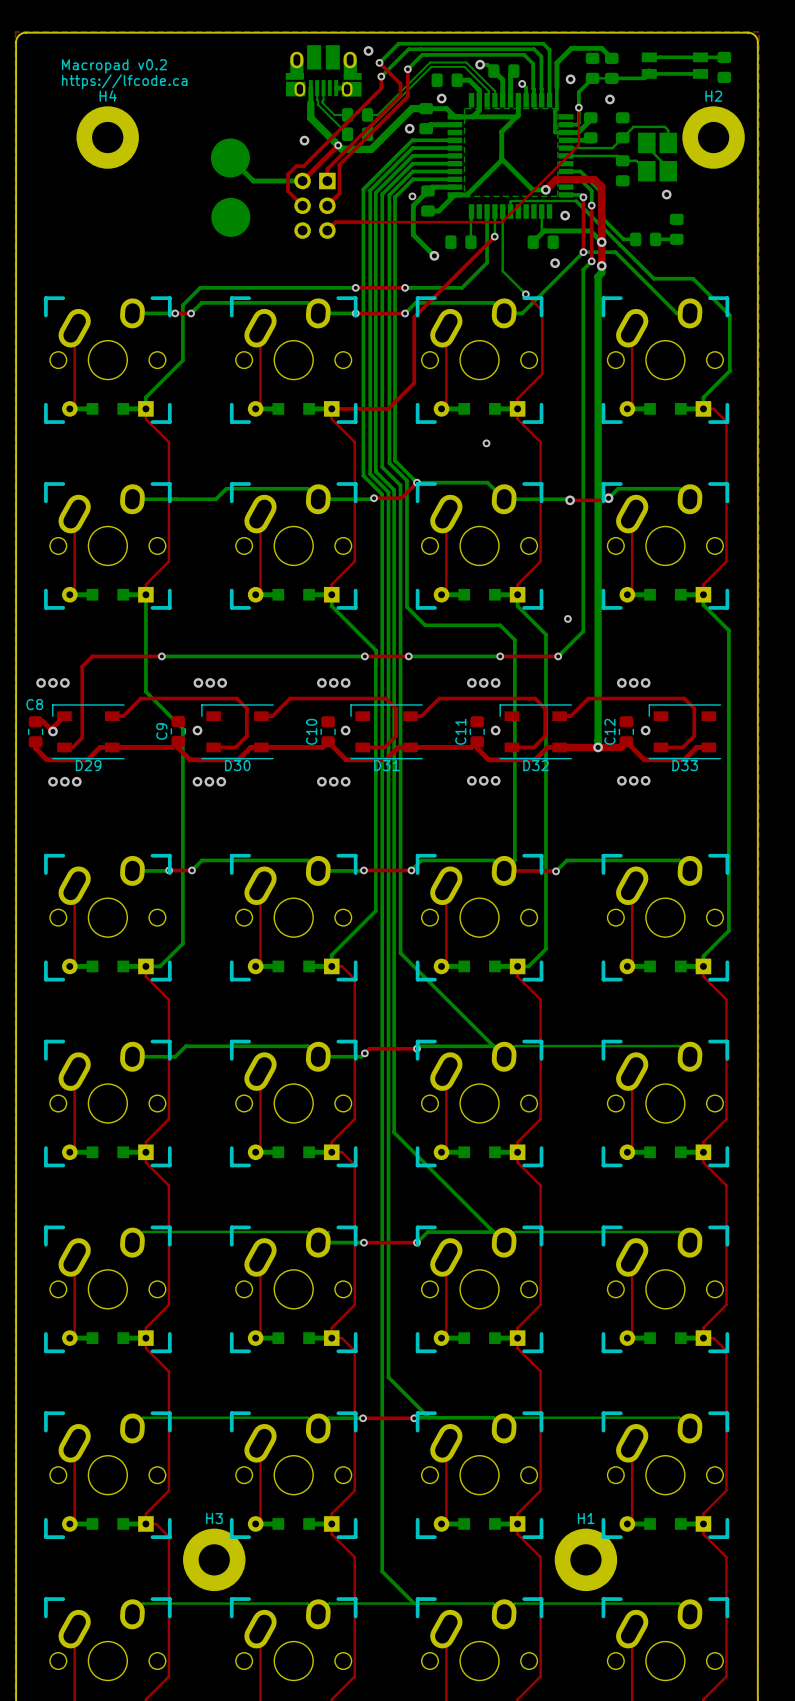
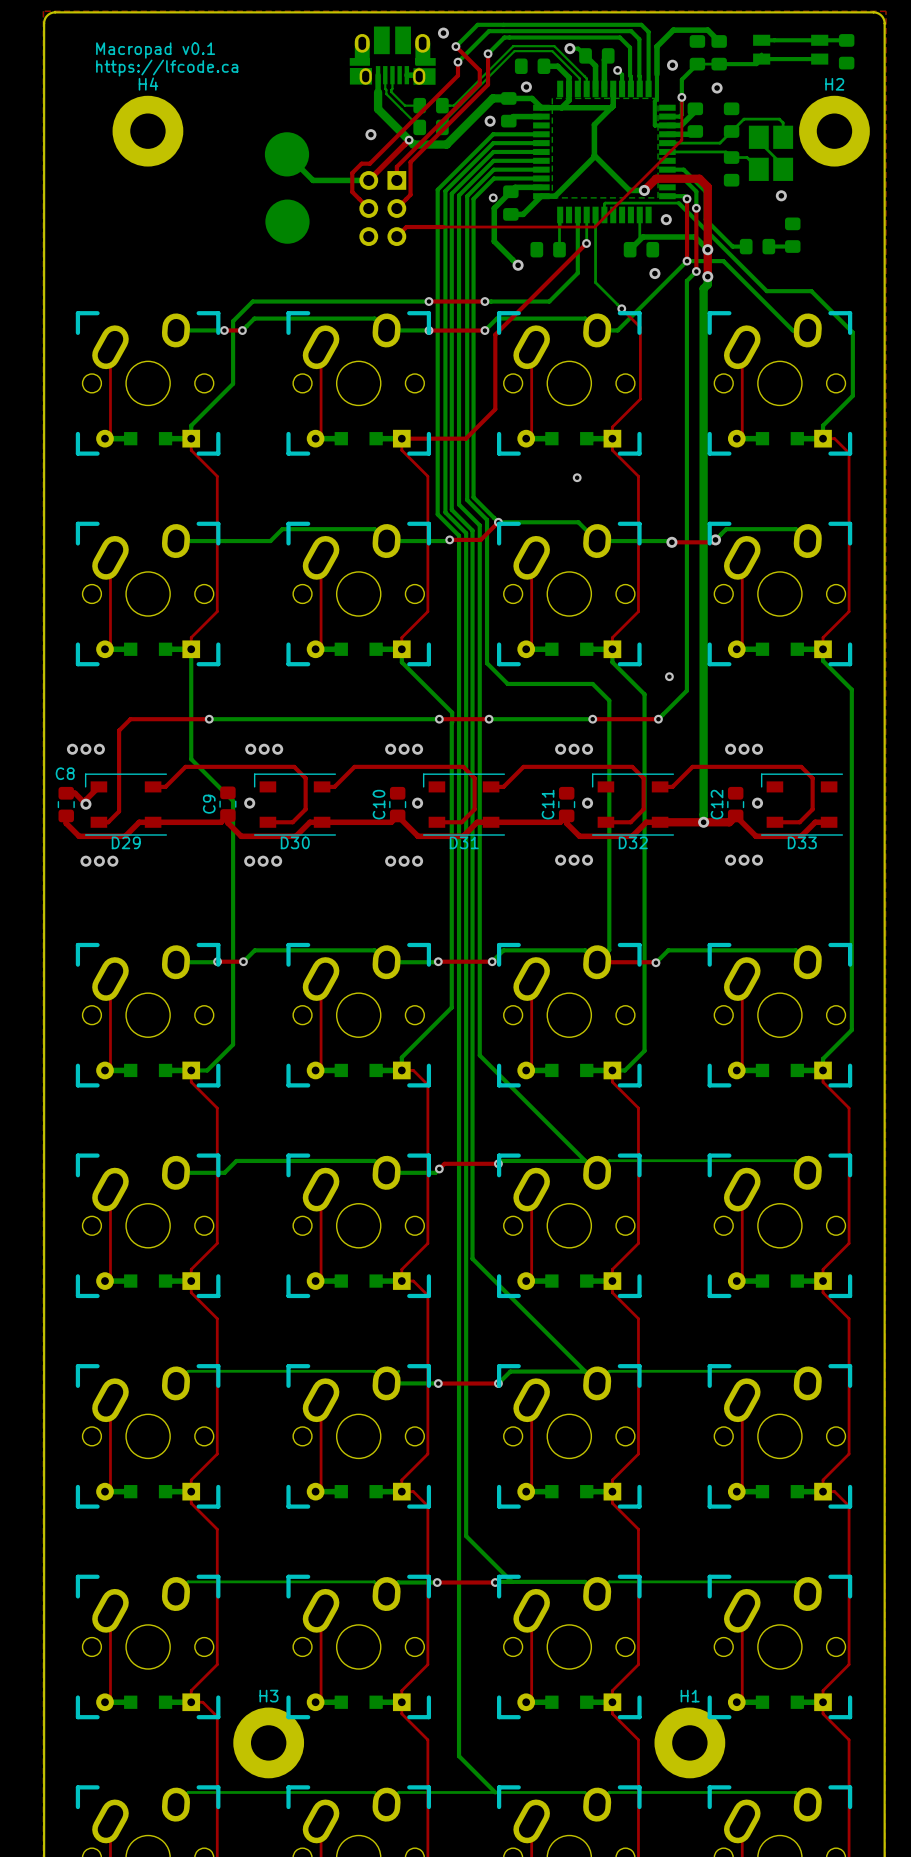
text: Macropad v0.2 (114, 66) -> Macropad v0.1 (155, 50)

